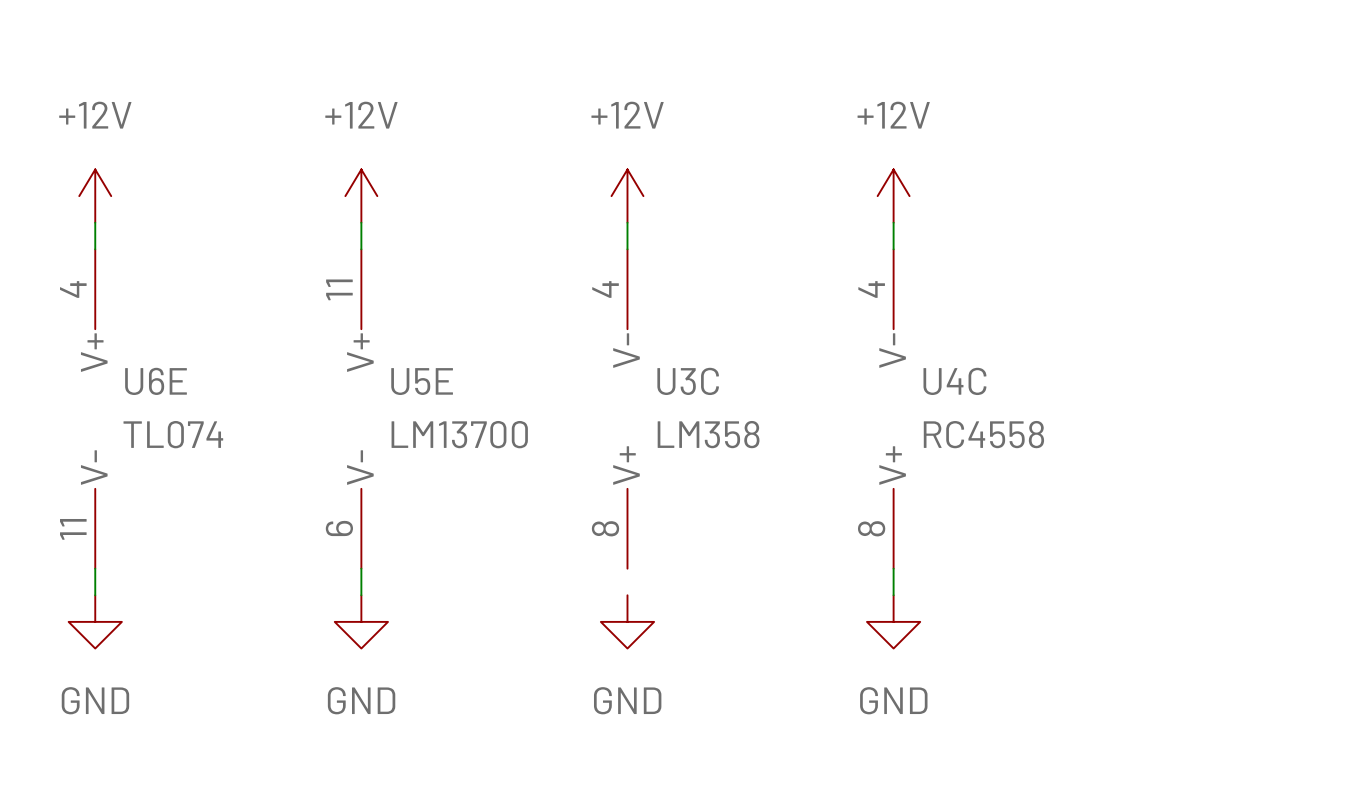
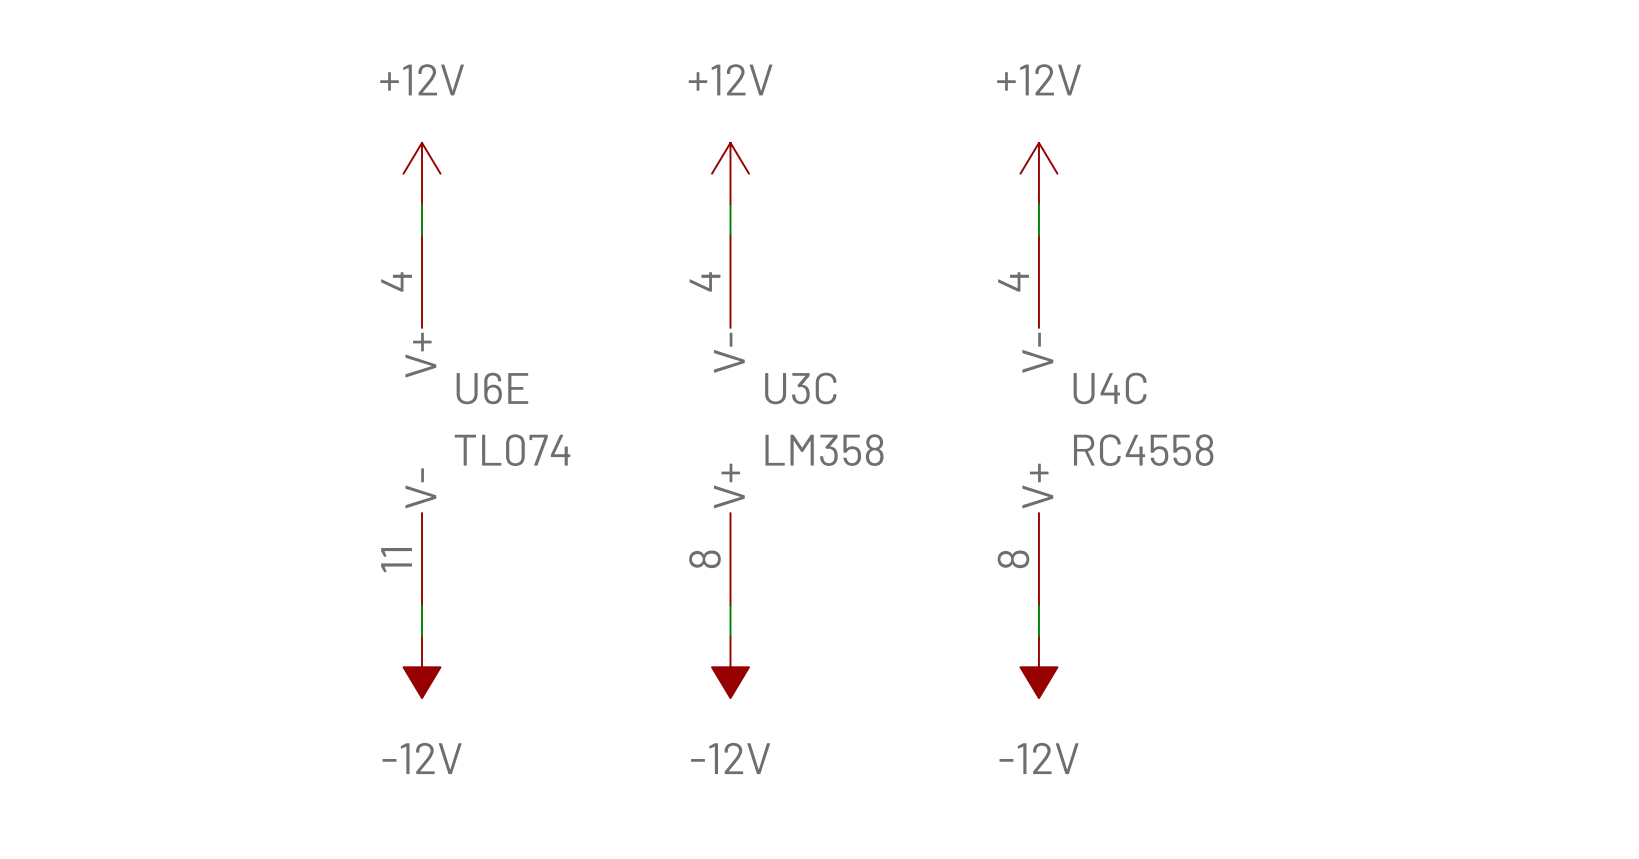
power symbol: +12V (95, 196) -> none
wire: (95, 222) (95, 249) -> none
U6E position: (95, 409) -> (422, 420)
U5E: LM13700 (361, 409) -> none
wire: (95, 568) (95, 595) -> none
wire: none -> (730, 605) (730, 636)
power symbol: GND (95, 621) -> none
power symbol: GND (361, 621) -> -12V (422, 667)
power symbol: GND (627, 621) -> -12V (730, 667)
power symbol: GND (893, 621) -> -12V (1038, 667)

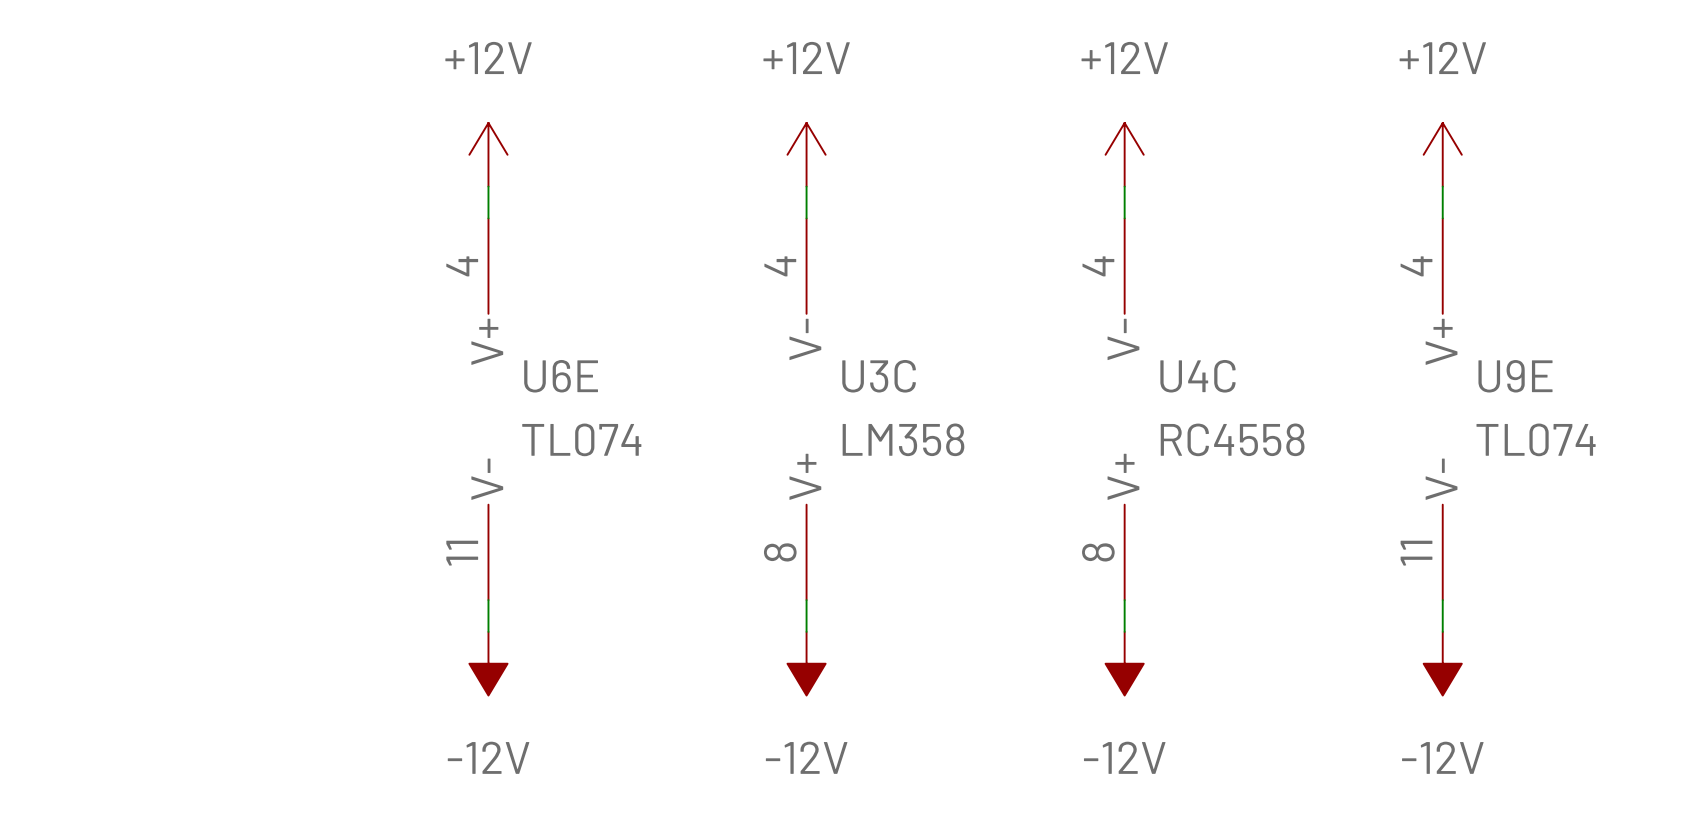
power symbol: none -> +12V (1442, 154)
wire: none -> (1442, 186) (1442, 218)
U9E: none -> TL074 (1442, 409)
wire: none -> (1442, 600) (1442, 631)
power symbol: none -> -12V (1442, 663)

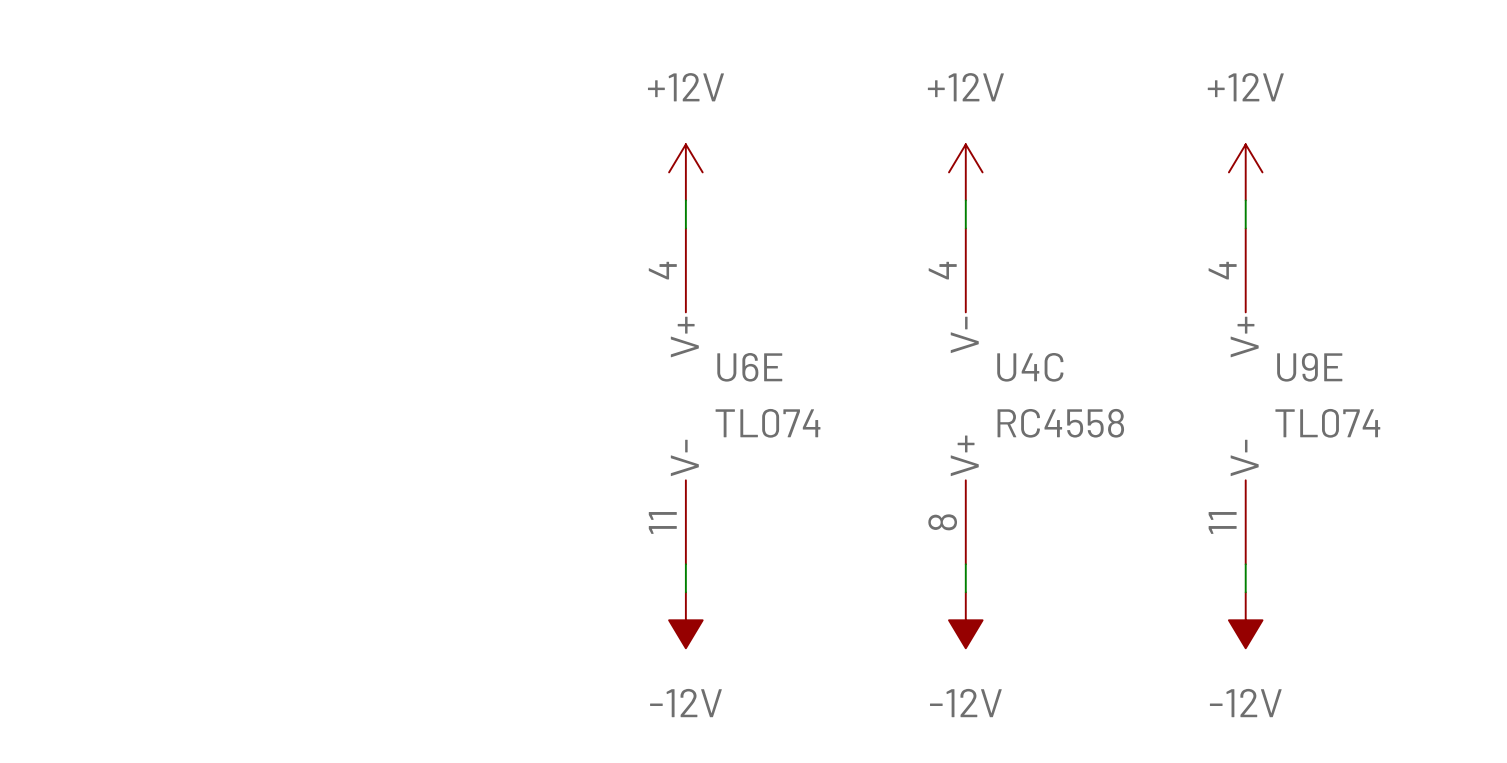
power symbol: +12V (488, 154) -> none
wire: (488, 186) (488, 218) -> none
U6E position: (488, 409) -> (685, 396)
U3C: LM358 (806, 409) -> none
wire: (488, 600) (488, 631) -> none
power symbol: -12V (488, 663) -> none

